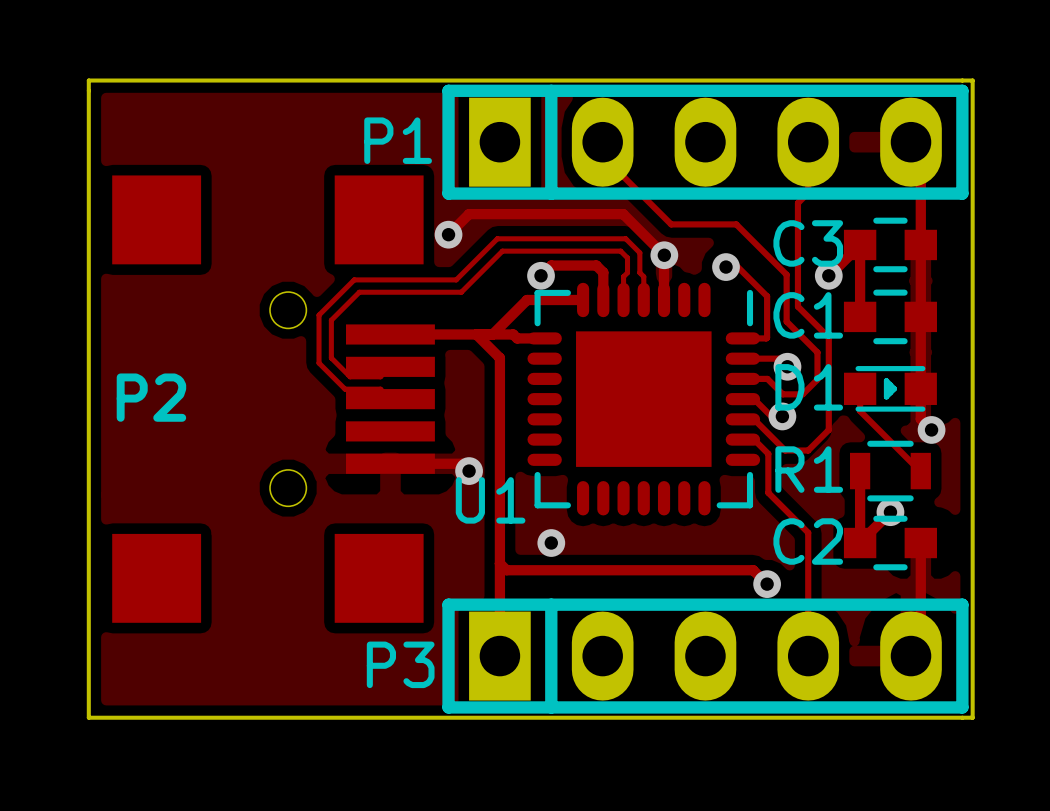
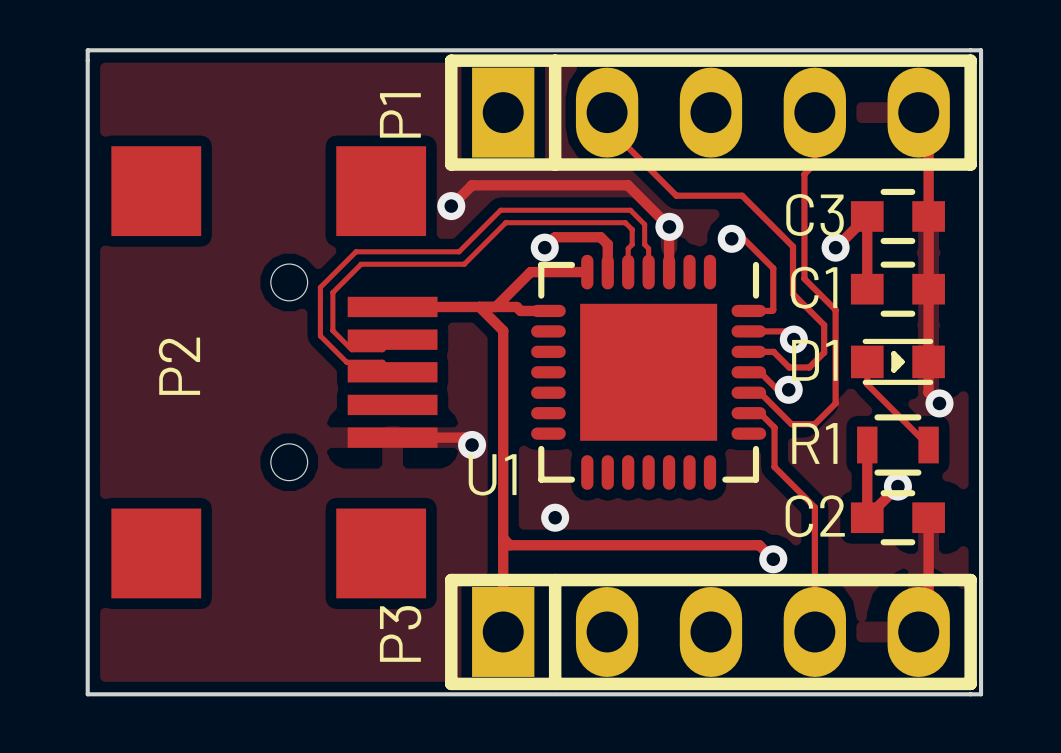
P1 name rotation: 0° (398, 140) -> 90° counterclockwise (400, 115)
P2 name rotation: 0° (151, 397) -> 90° counterclockwise (179, 366)
P3 name rotation: 0° (400, 664) -> 90° counterclockwise (400, 633)

